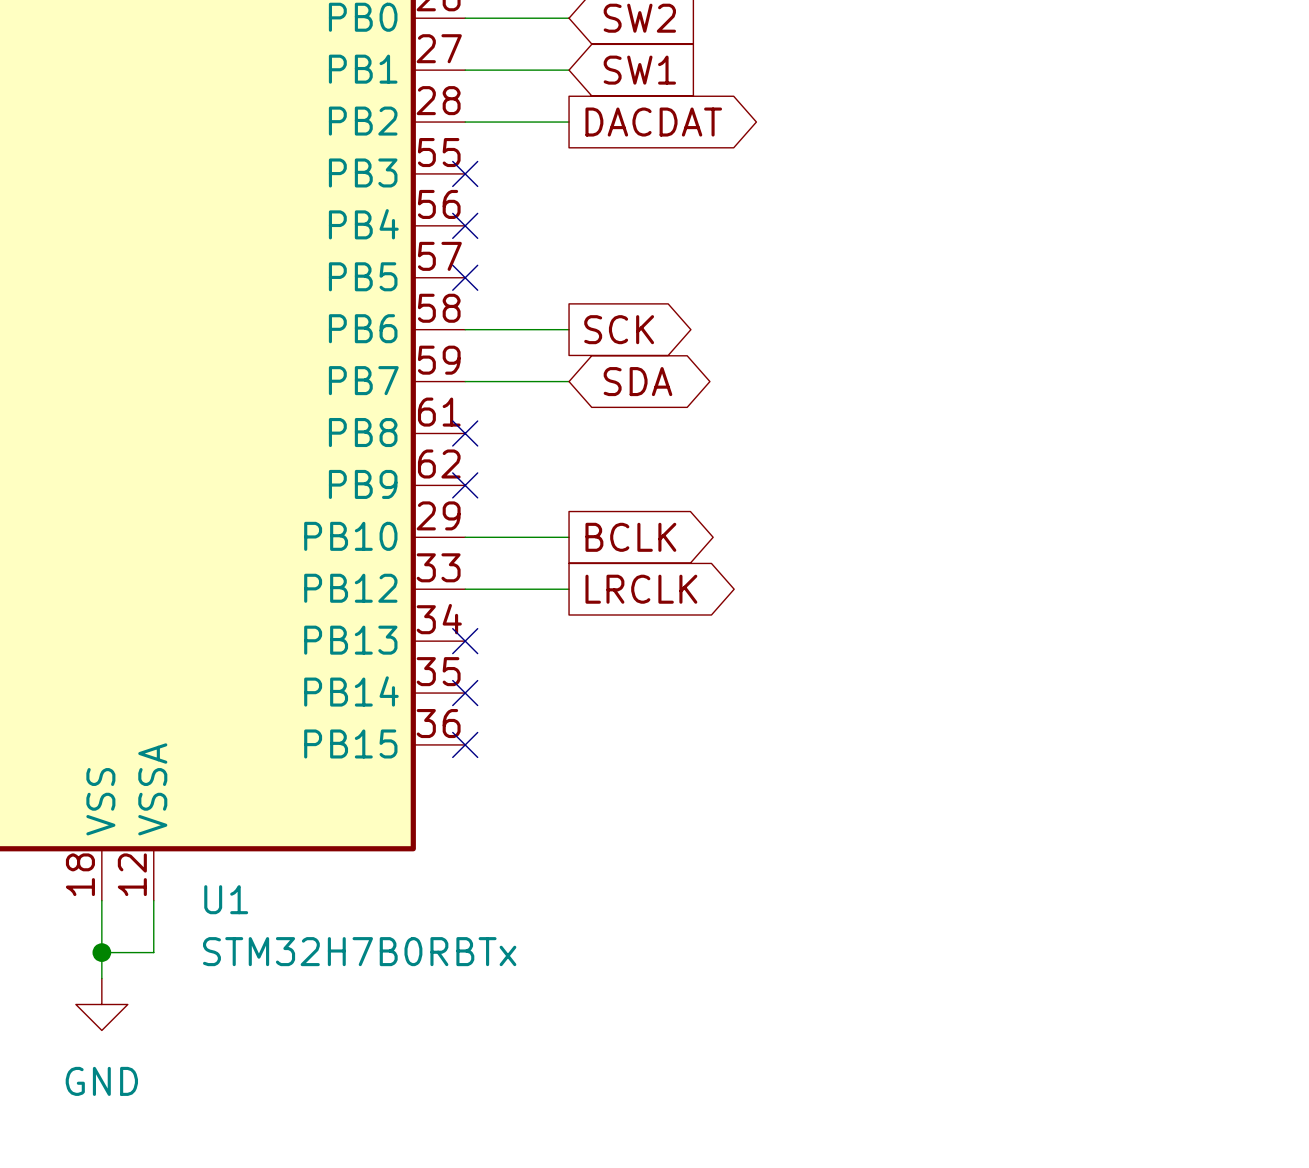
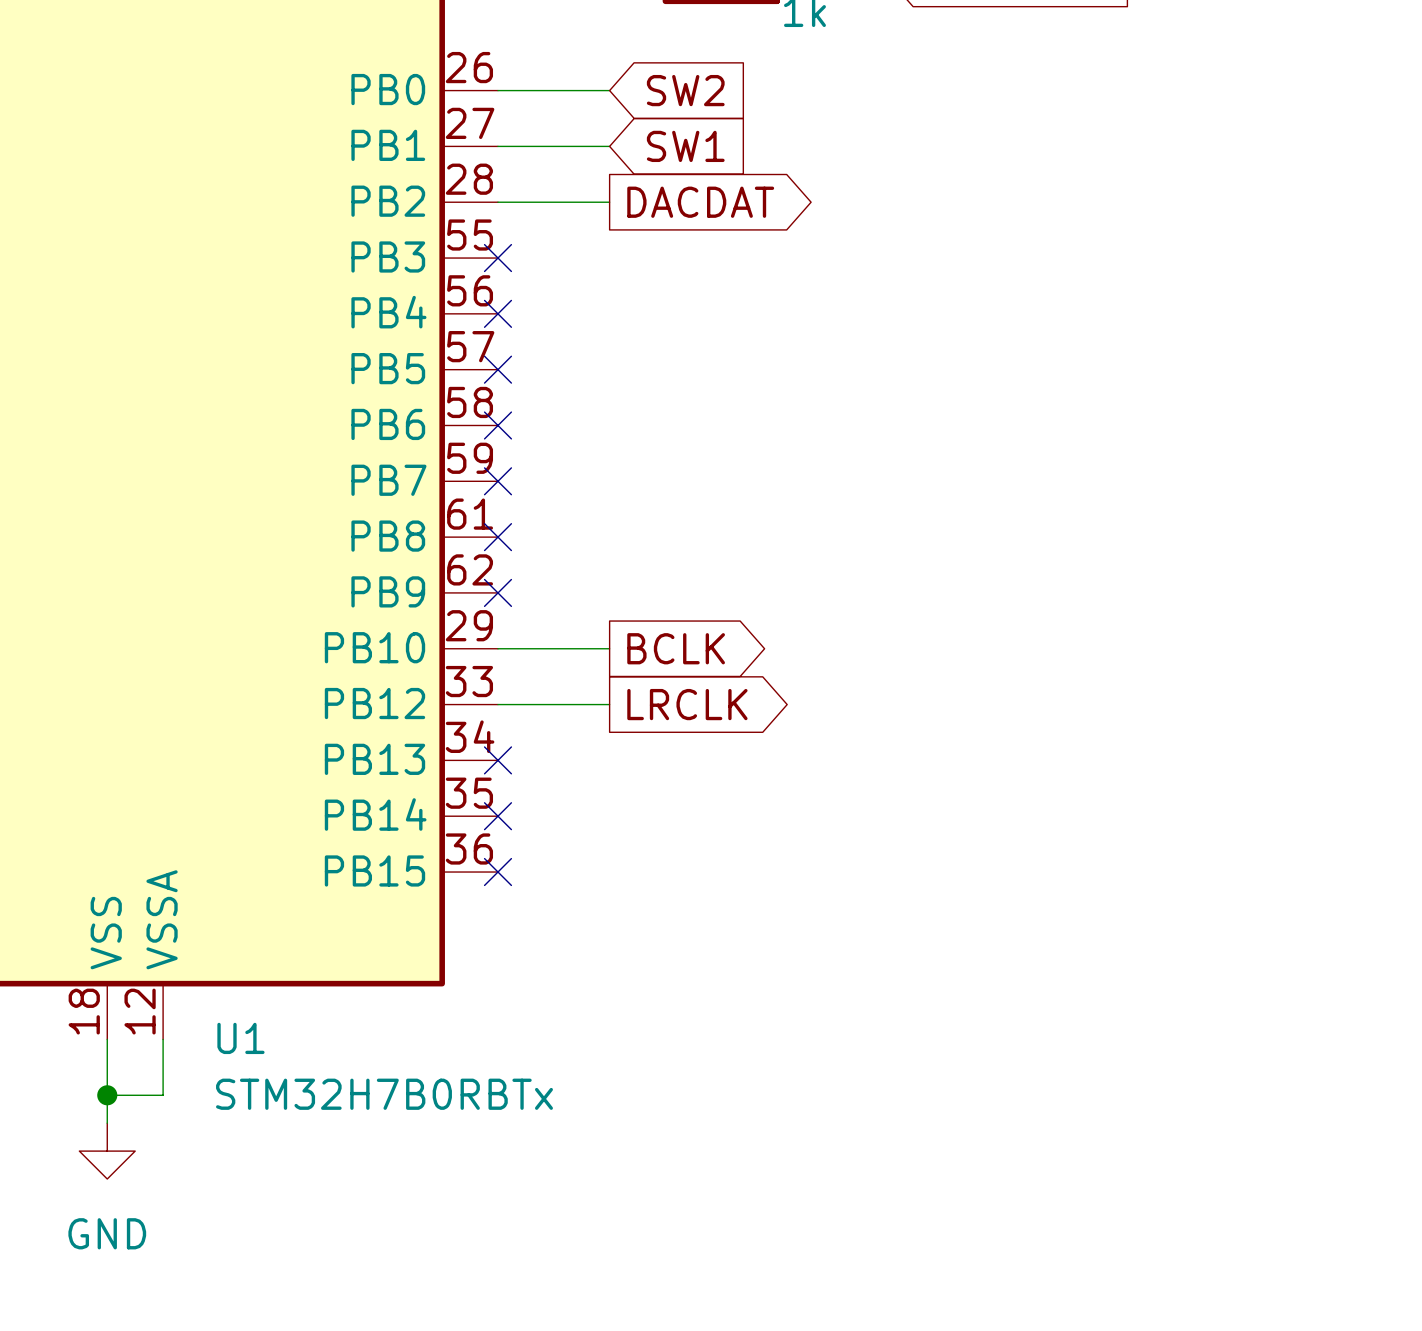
wire: (465, 329) (569, 329) -> none
no-connect mark: none -> (497, 425)
global label: SCK (619, 329) -> none
wire: (465, 381) (569, 381) -> none
no-connect mark: none -> (497, 481)
global label: SDA (637, 381) -> none

